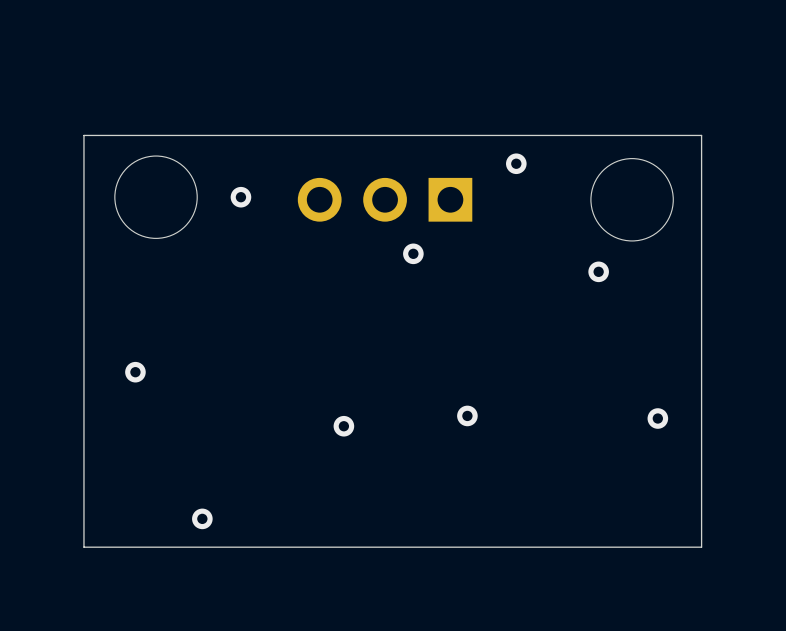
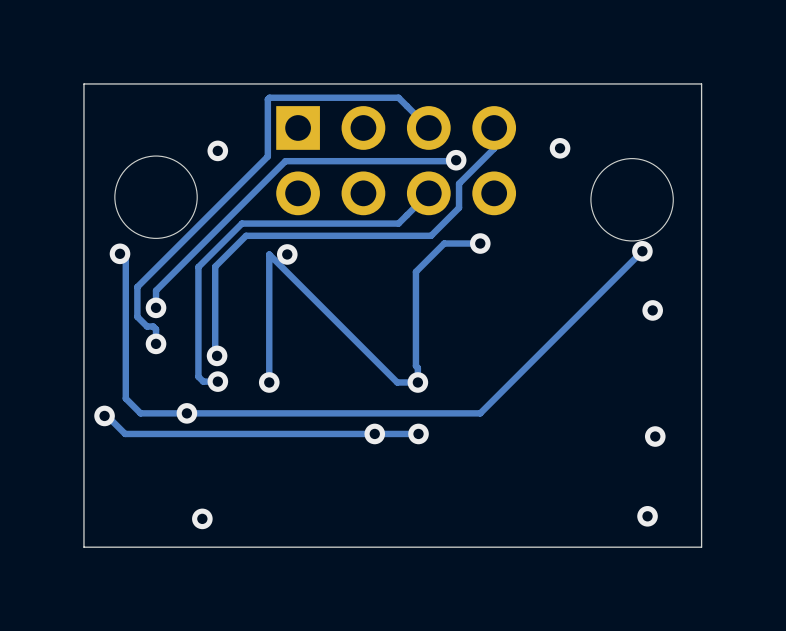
track: none -> (428, 127) (398, 97) (269, 97) (267, 99) (267, 156) (137, 287) (137, 316) (147, 326) (153, 326) (156, 329) (156, 343)
track: none -> (494, 127) (494, 148) (459, 183) (459, 207) (431, 235) (246, 235) (215, 266) (215, 354) (217, 355)
board edge: (701, 135) (83, 135) -> (701, 135) (701, 83) (83, 83) (83, 135)
via: none -> (560, 148)
via: none -> (217, 150)
part: none -> (396, 160)
track: none -> (456, 160) (285, 161) (156, 290) (156, 307)
via: none -> (456, 160)
via: (516, 163) -> none
track: none -> (428, 193) (398, 223) (241, 223) (198, 267) (198, 376) (203, 381) (217, 381)
via: (240, 197) -> none
part: (385, 199) -> none
track: none -> (480, 243) (444, 243) (415, 271) (415, 366) (417, 367) (417, 382) (397, 382) (269, 254) (269, 382)
via: none -> (480, 243)
track: none -> (642, 251) (480, 413) (140, 413) (125, 398) (125, 259) (120, 253)
via: none -> (642, 251)
via: none -> (120, 253)
via: (413, 253) -> none
via: none -> (287, 254)
via: (598, 271) -> none
via: none -> (156, 307)
via: none -> (652, 310)
via: none -> (156, 343)
via: none -> (217, 355)
via: (135, 372) -> none
via: none -> (217, 381)
via: none -> (269, 382)
via: none -> (417, 382)
via: none -> (186, 413)
track: none -> (104, 415) (107, 415) (125, 433) (418, 433)
via: none -> (104, 415)
via: (467, 415) -> none
via position: (657, 418) -> (655, 436)
via position: (343, 426) -> (374, 433)
via: none -> (418, 433)
via: none -> (647, 516)

